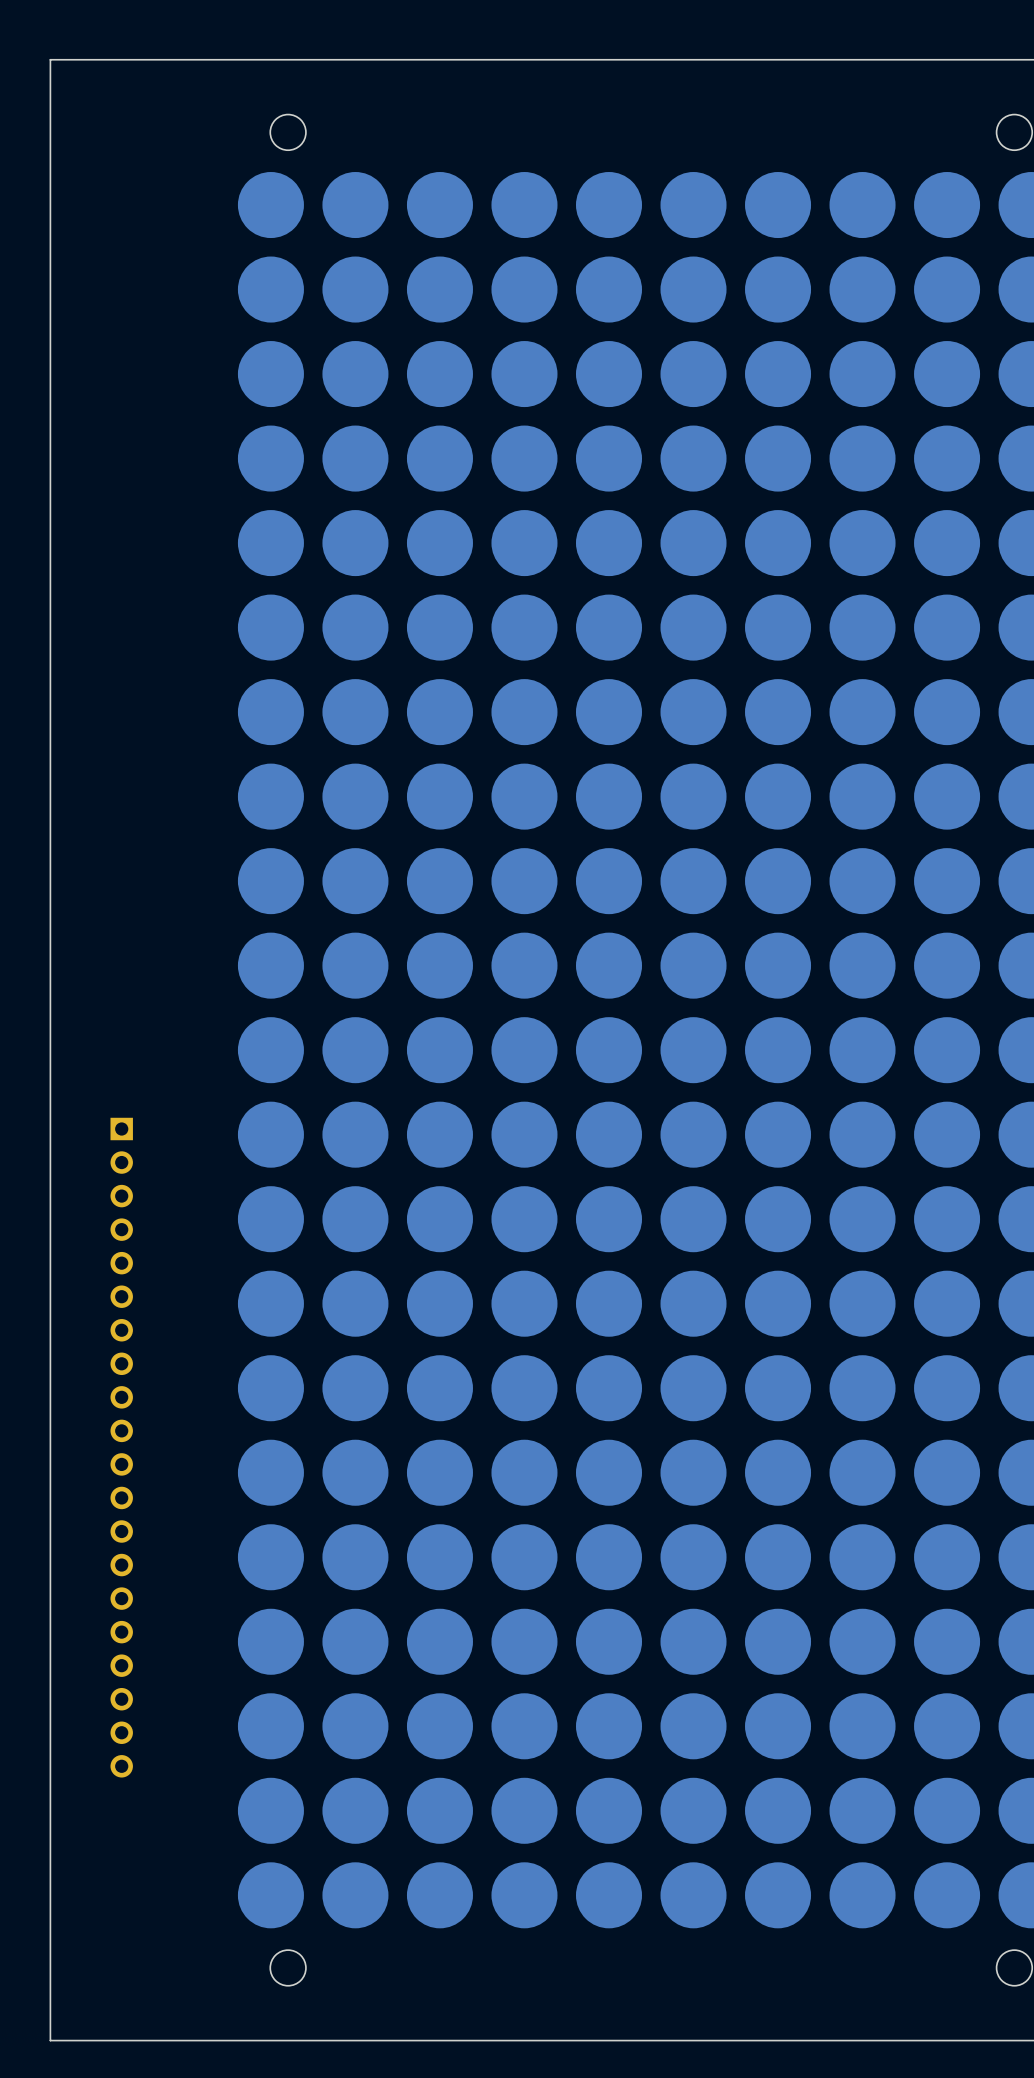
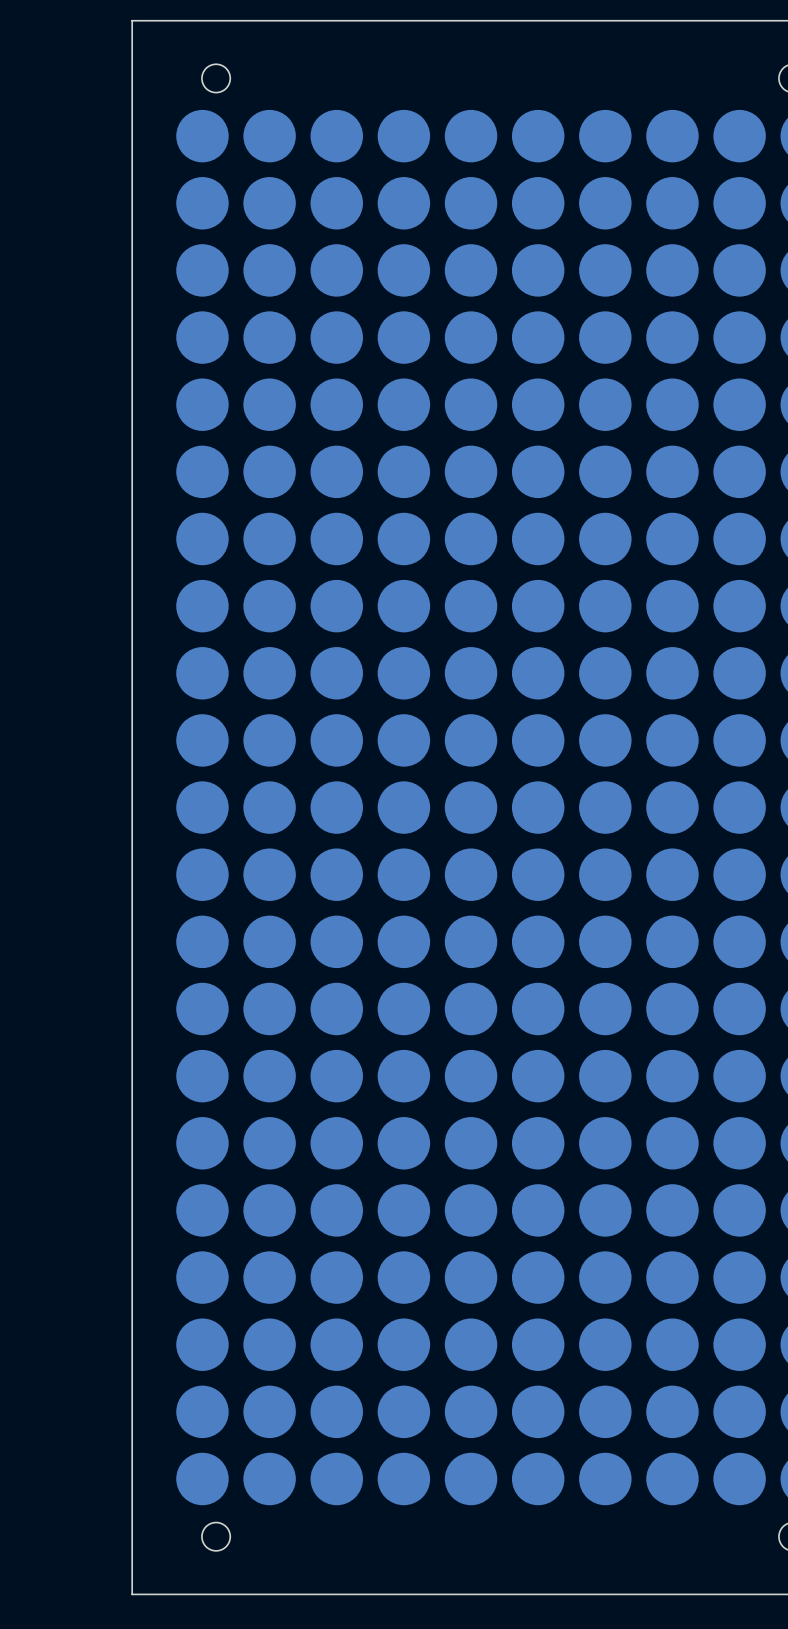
board edge: (182, 59) (50, 59) (50, 2040) (182, 2040) -> (132, 20) (132, 1594)
part: (121, 1447) -> none

